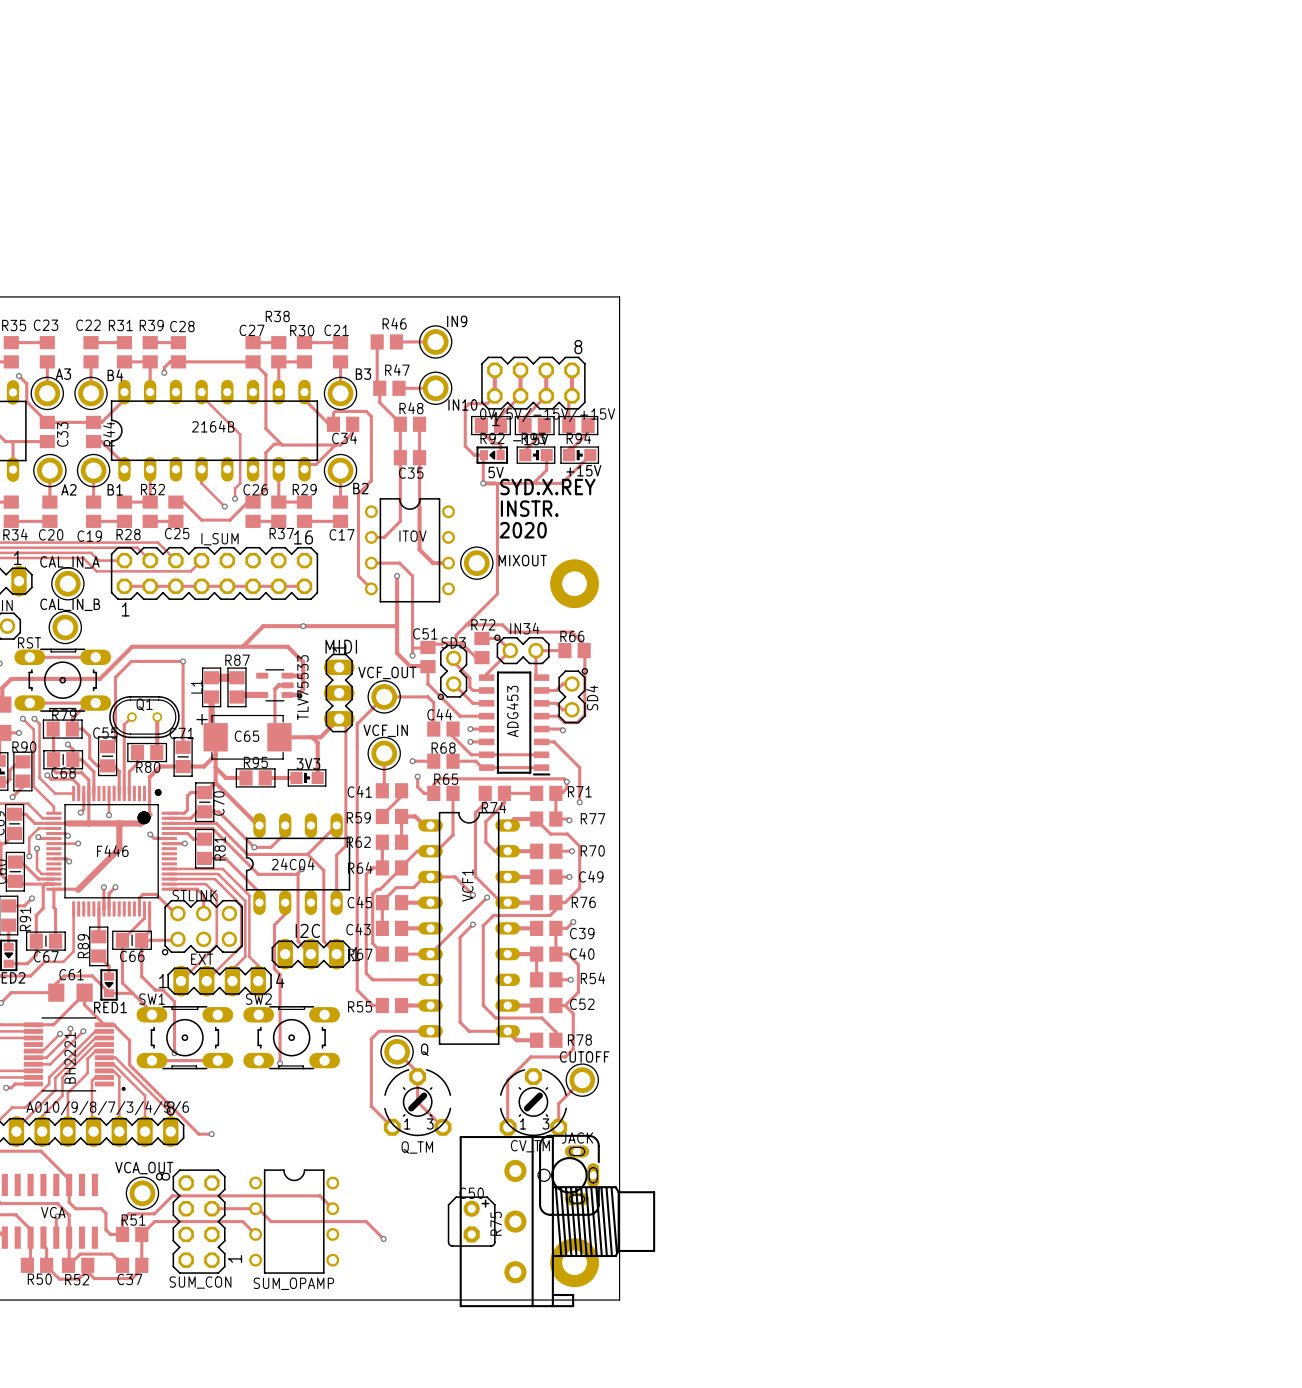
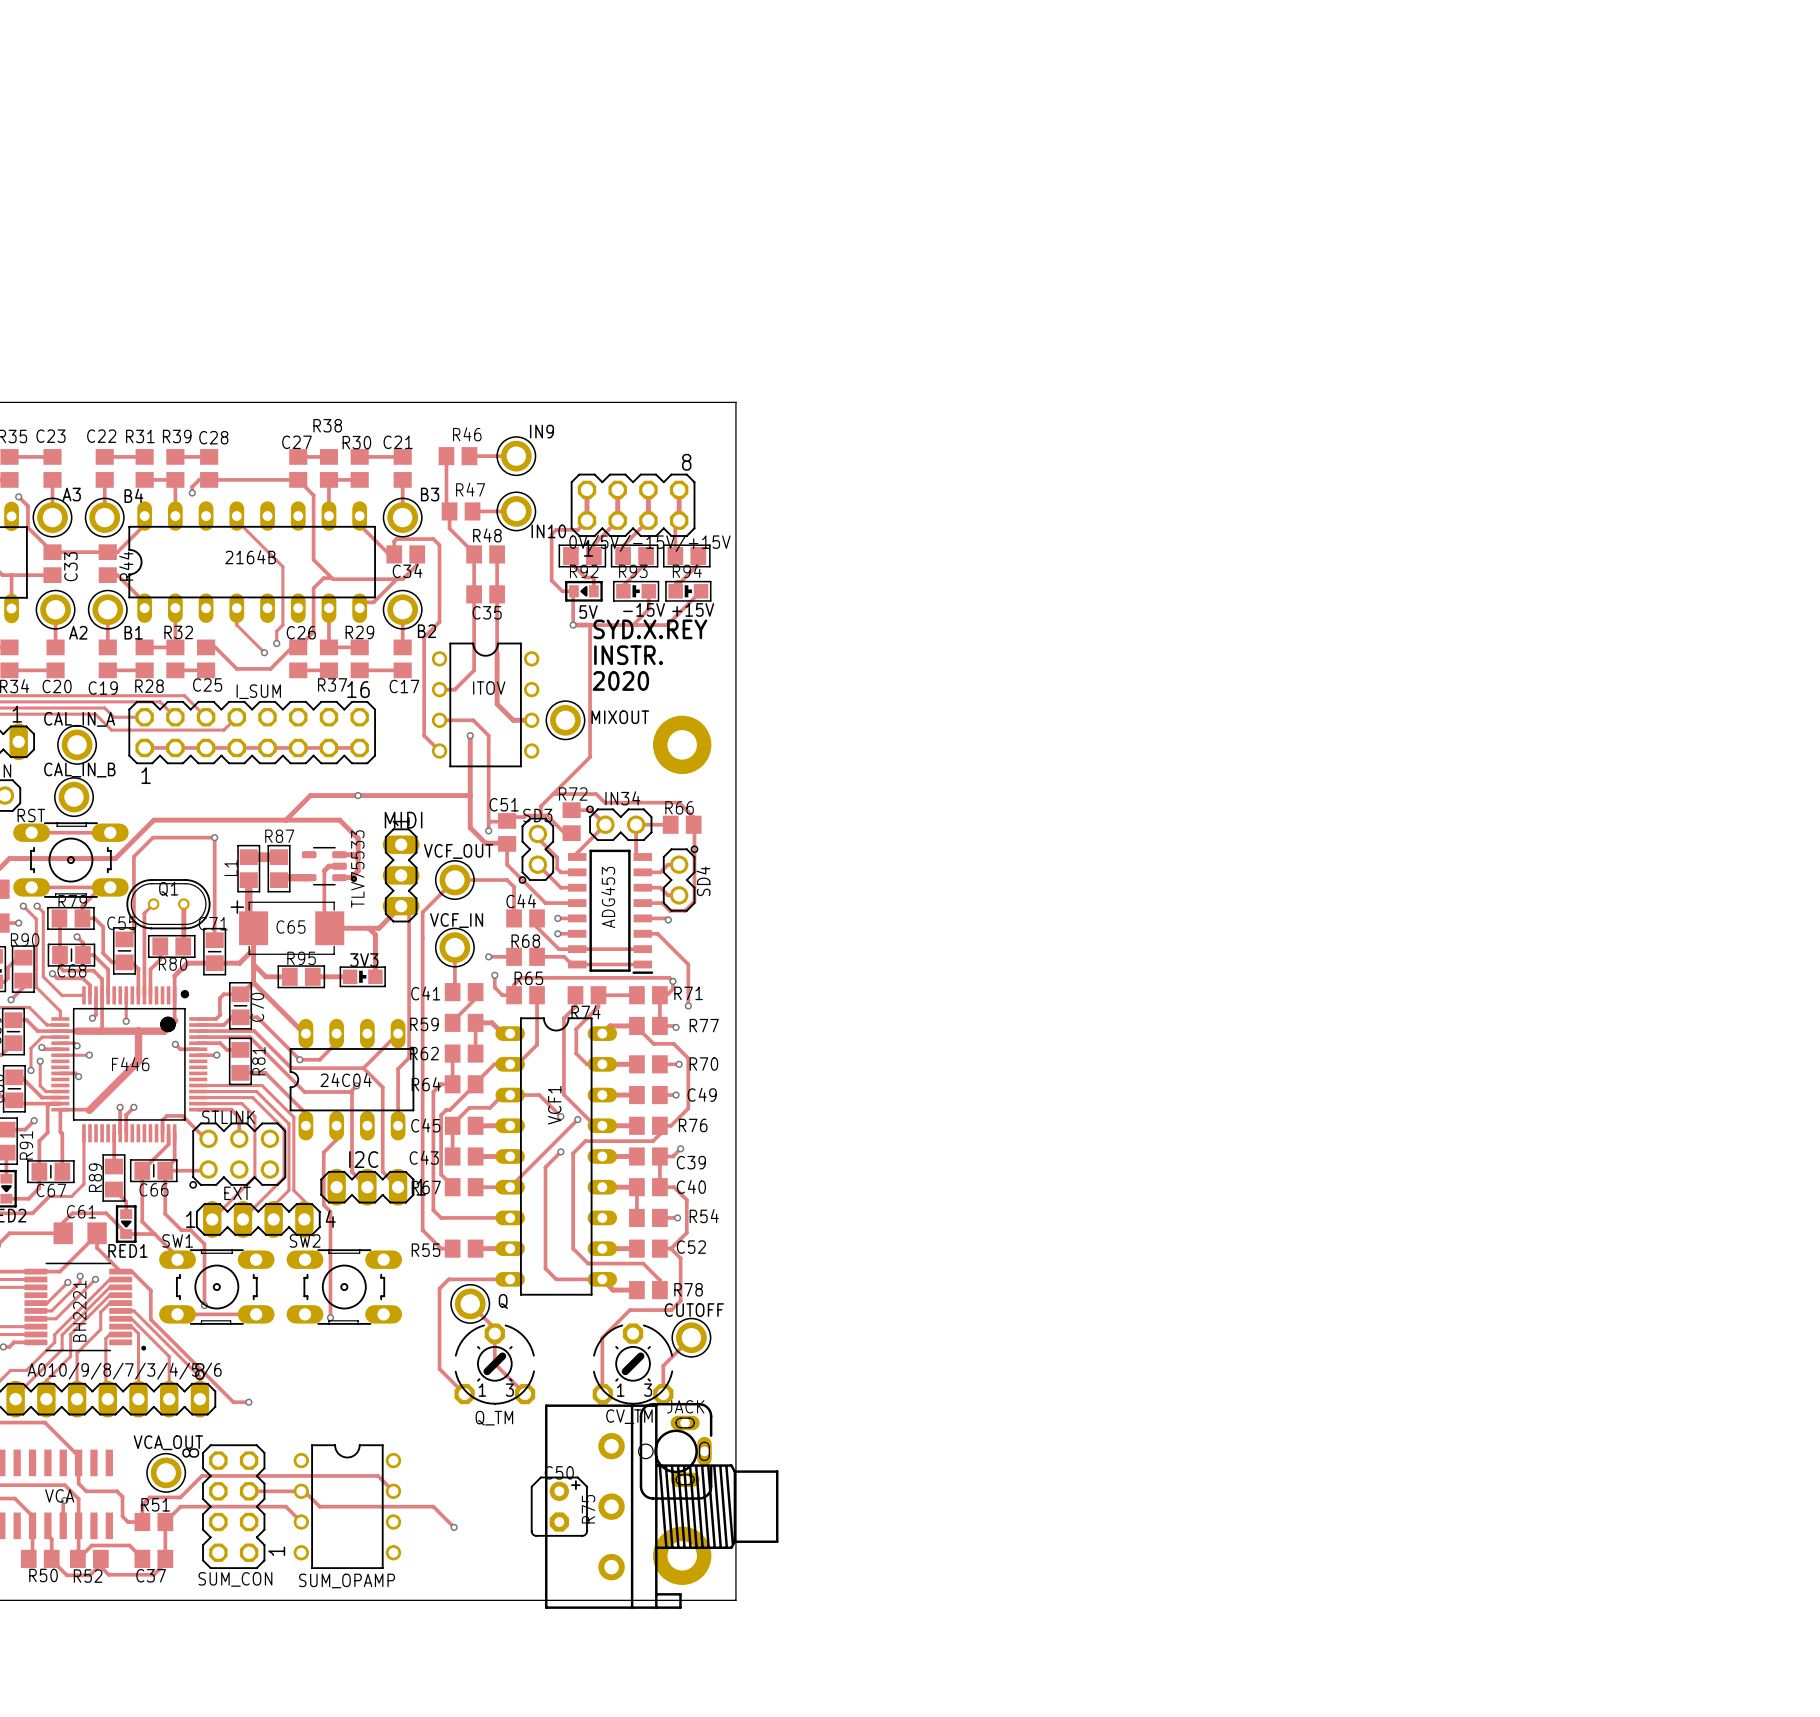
-15V rotation: 0° (535, 455) -> 180° (636, 591)

